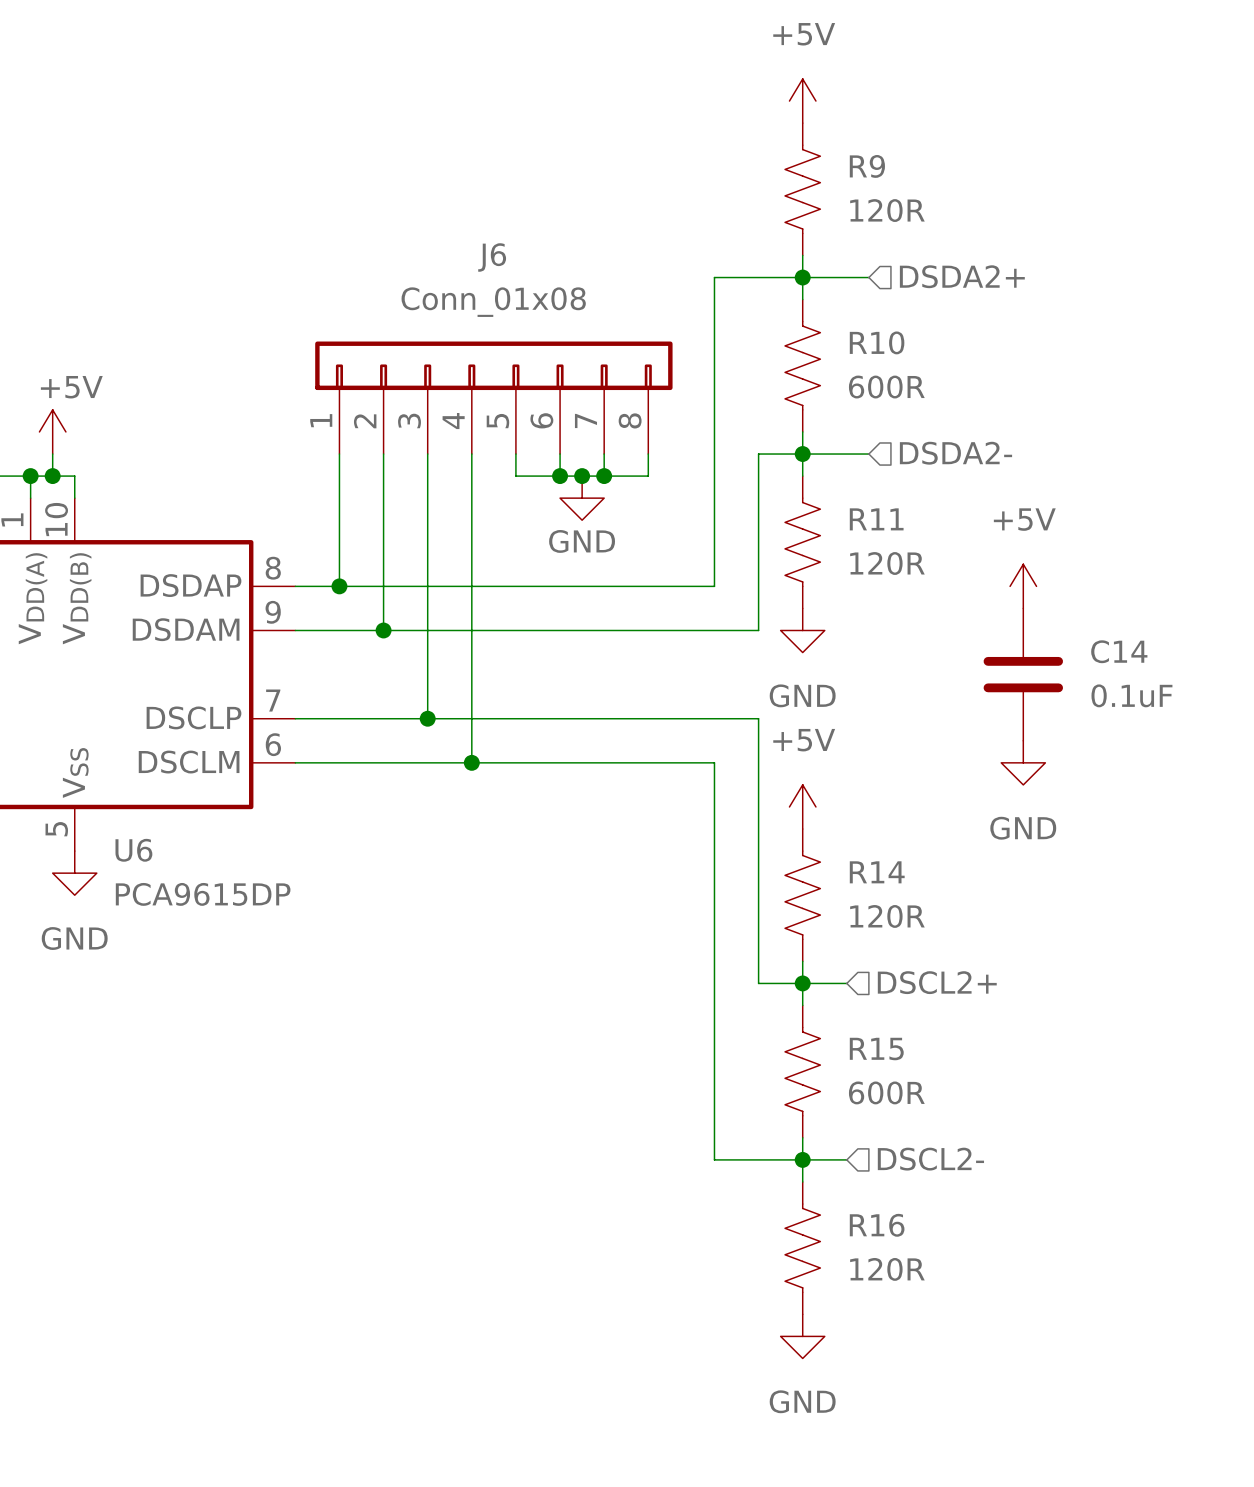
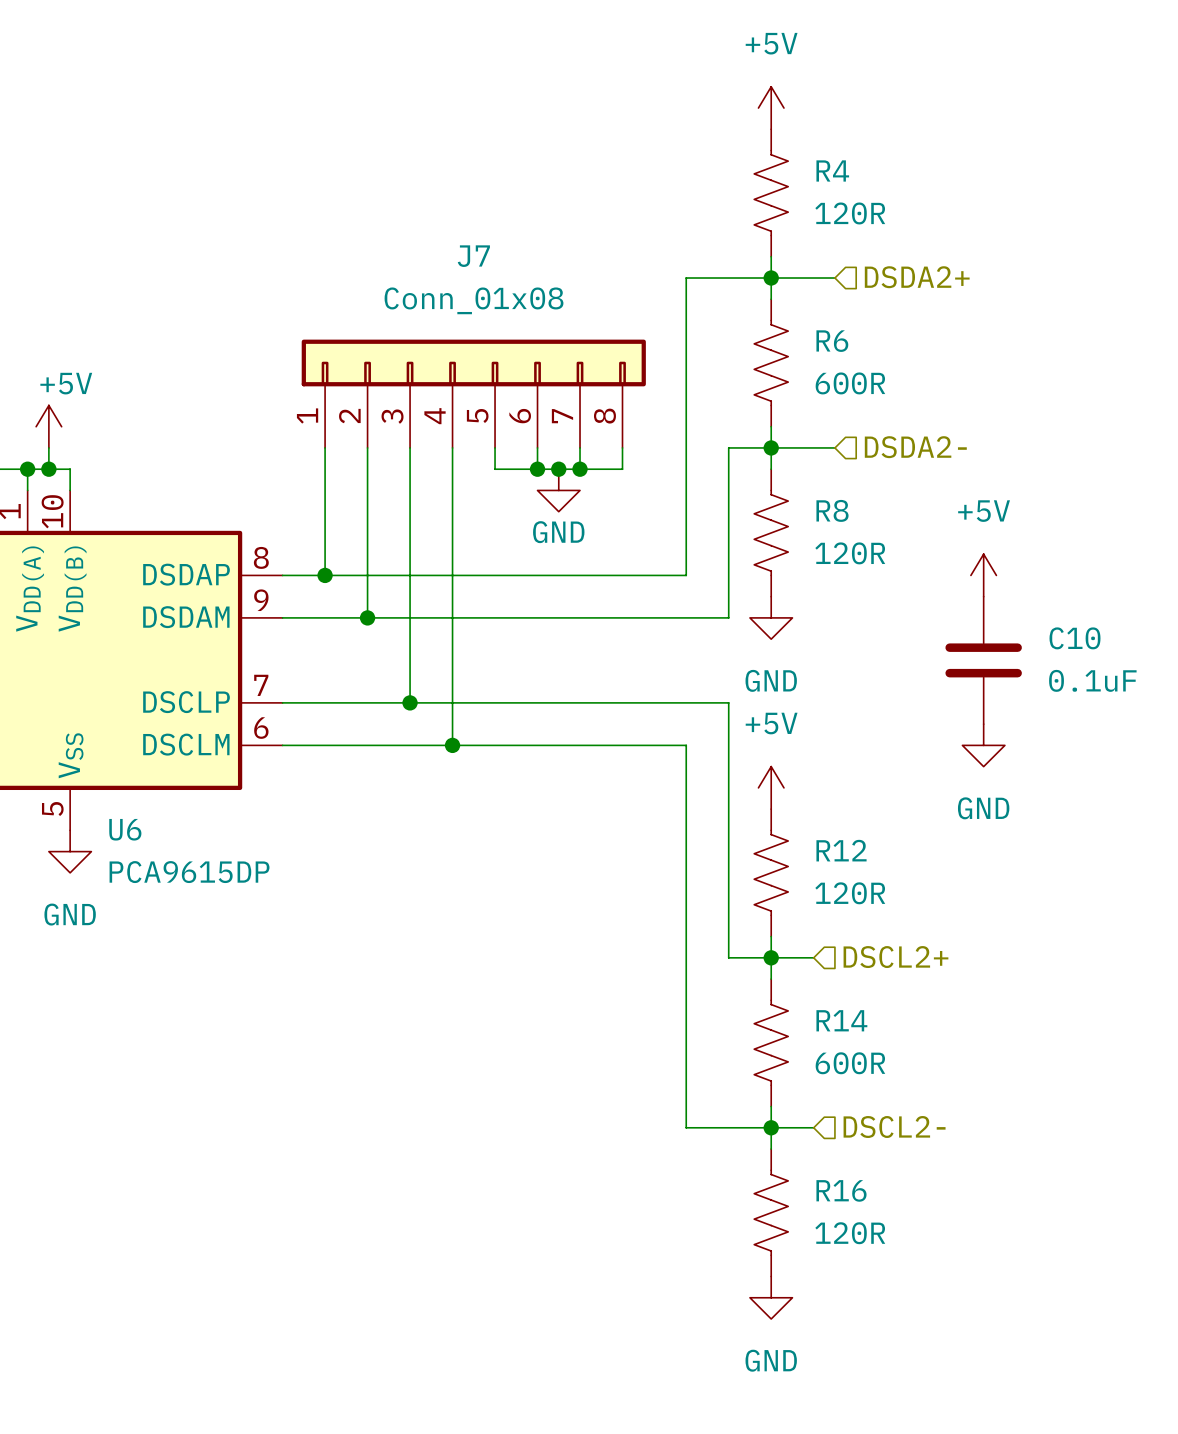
R9 name: R9 (867, 166) -> R4 (832, 170)
J6 name: J6 (492, 257) -> J7 (473, 256)
R10 name: R10 (877, 342) -> R6 (832, 341)
R11 name: R11 (876, 519) -> R8 (832, 510)
C14 name: C14 (1119, 651) -> C10 (1075, 638)
R14 name: R14 (877, 872) -> R12 (841, 850)
R15 name: R15 (876, 1049) -> R14 (841, 1020)

